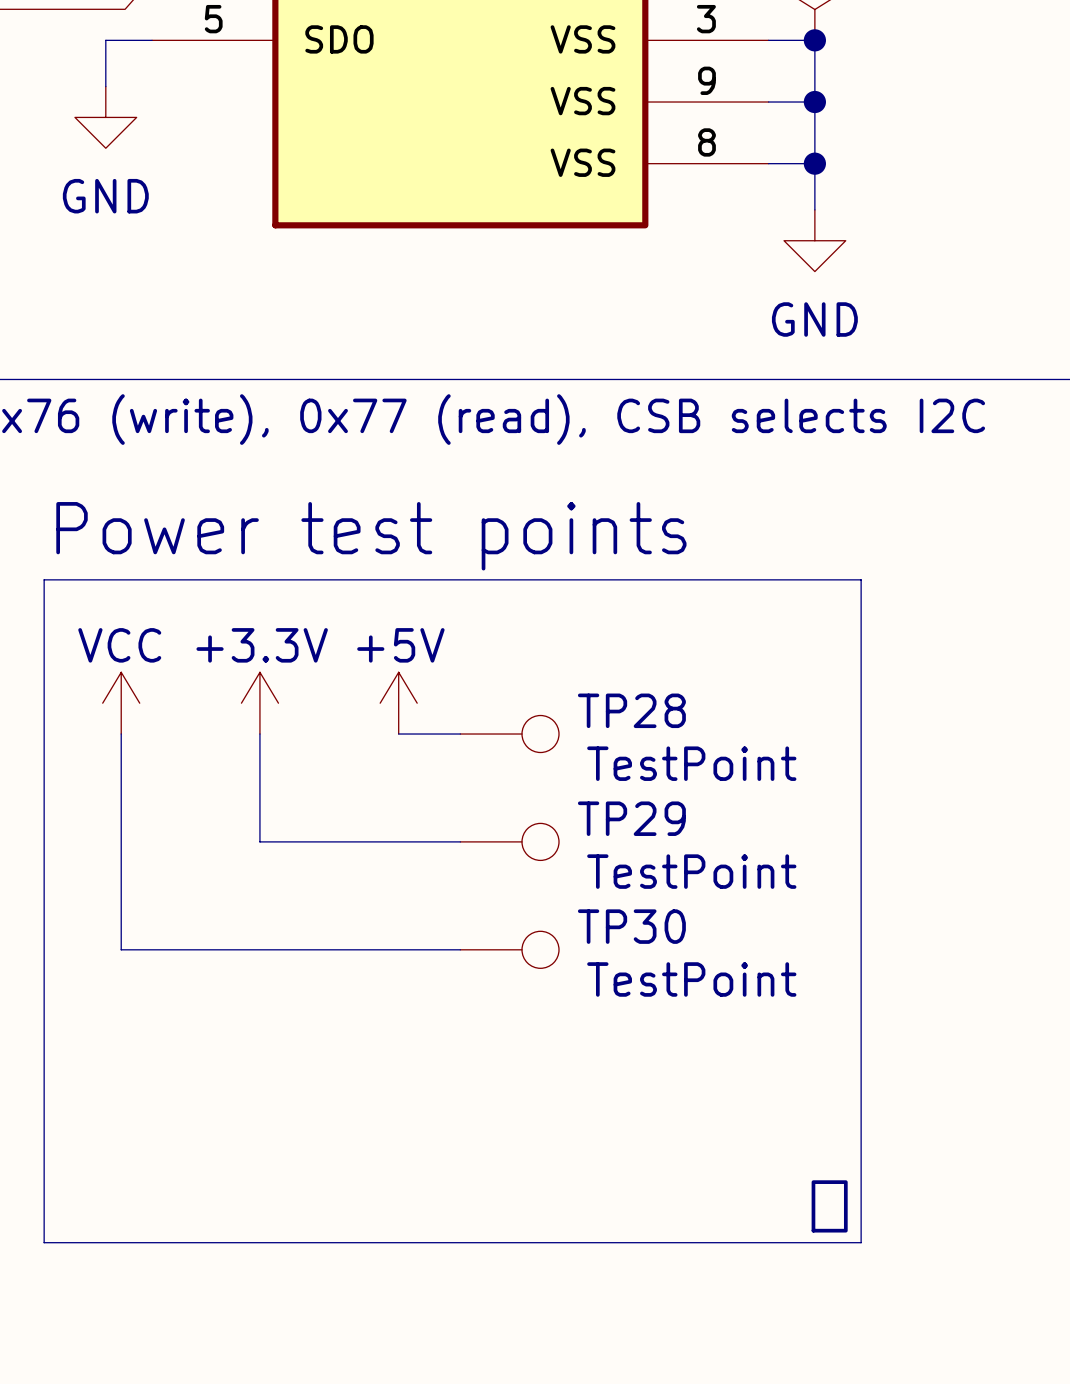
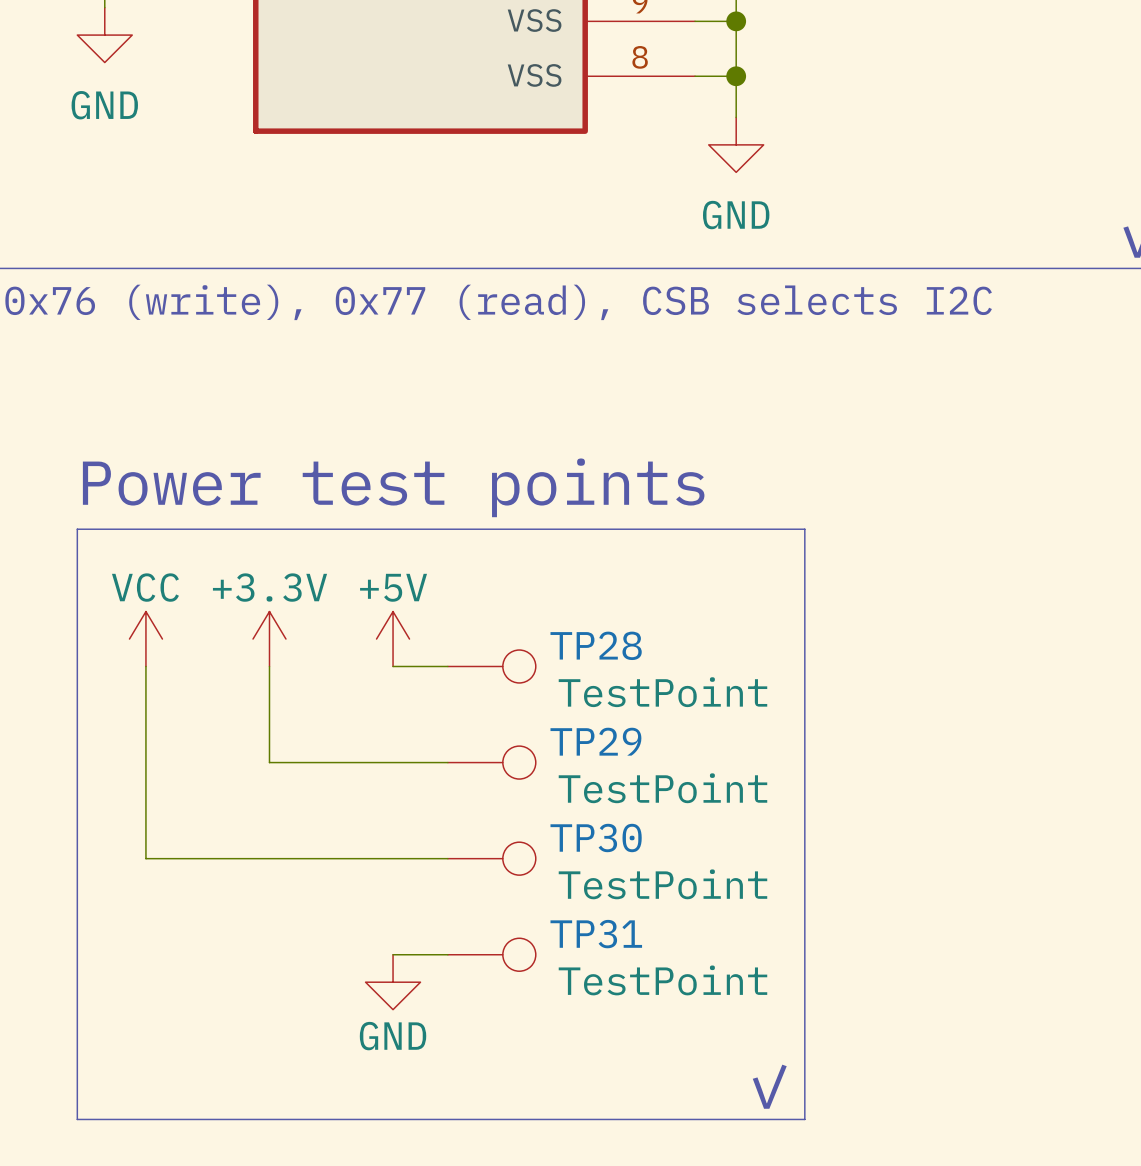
text position: Power test points (371, 536) -> Power test points (393, 487)
line: (44, 579) (44, 1242) (861, 1242) (861, 579) (44, 579) -> (77, 529) (77, 1119) (804, 1119) (804, 529) (77, 529)
power symbol position: VCC (121, 703) -> VCC (145, 639)
power symbol position: +3.3V (259, 703) -> +3.3V (269, 639)
power symbol position: +5V (398, 703) -> +5V (393, 639)
wire: (121, 734) (121, 949) (460, 949) -> (145, 666) (145, 858) (447, 858)
wire: (259, 734) (259, 841) (460, 841) -> (269, 666) (269, 762) (447, 762)
wire: (398, 734) (460, 734) -> (393, 666) (447, 666)
TP28 position: (509, 734) -> (491, 666)
TP29 position: (509, 841) -> (491, 762)
TP30 position: (509, 949) -> (491, 858)
wire: none -> (393, 954) (447, 954)
TP31: none -> TestPoint (491, 954)
power symbol: none -> GND (393, 982)
text position: ✓ (829, 1206) -> ✓ (769, 1086)

